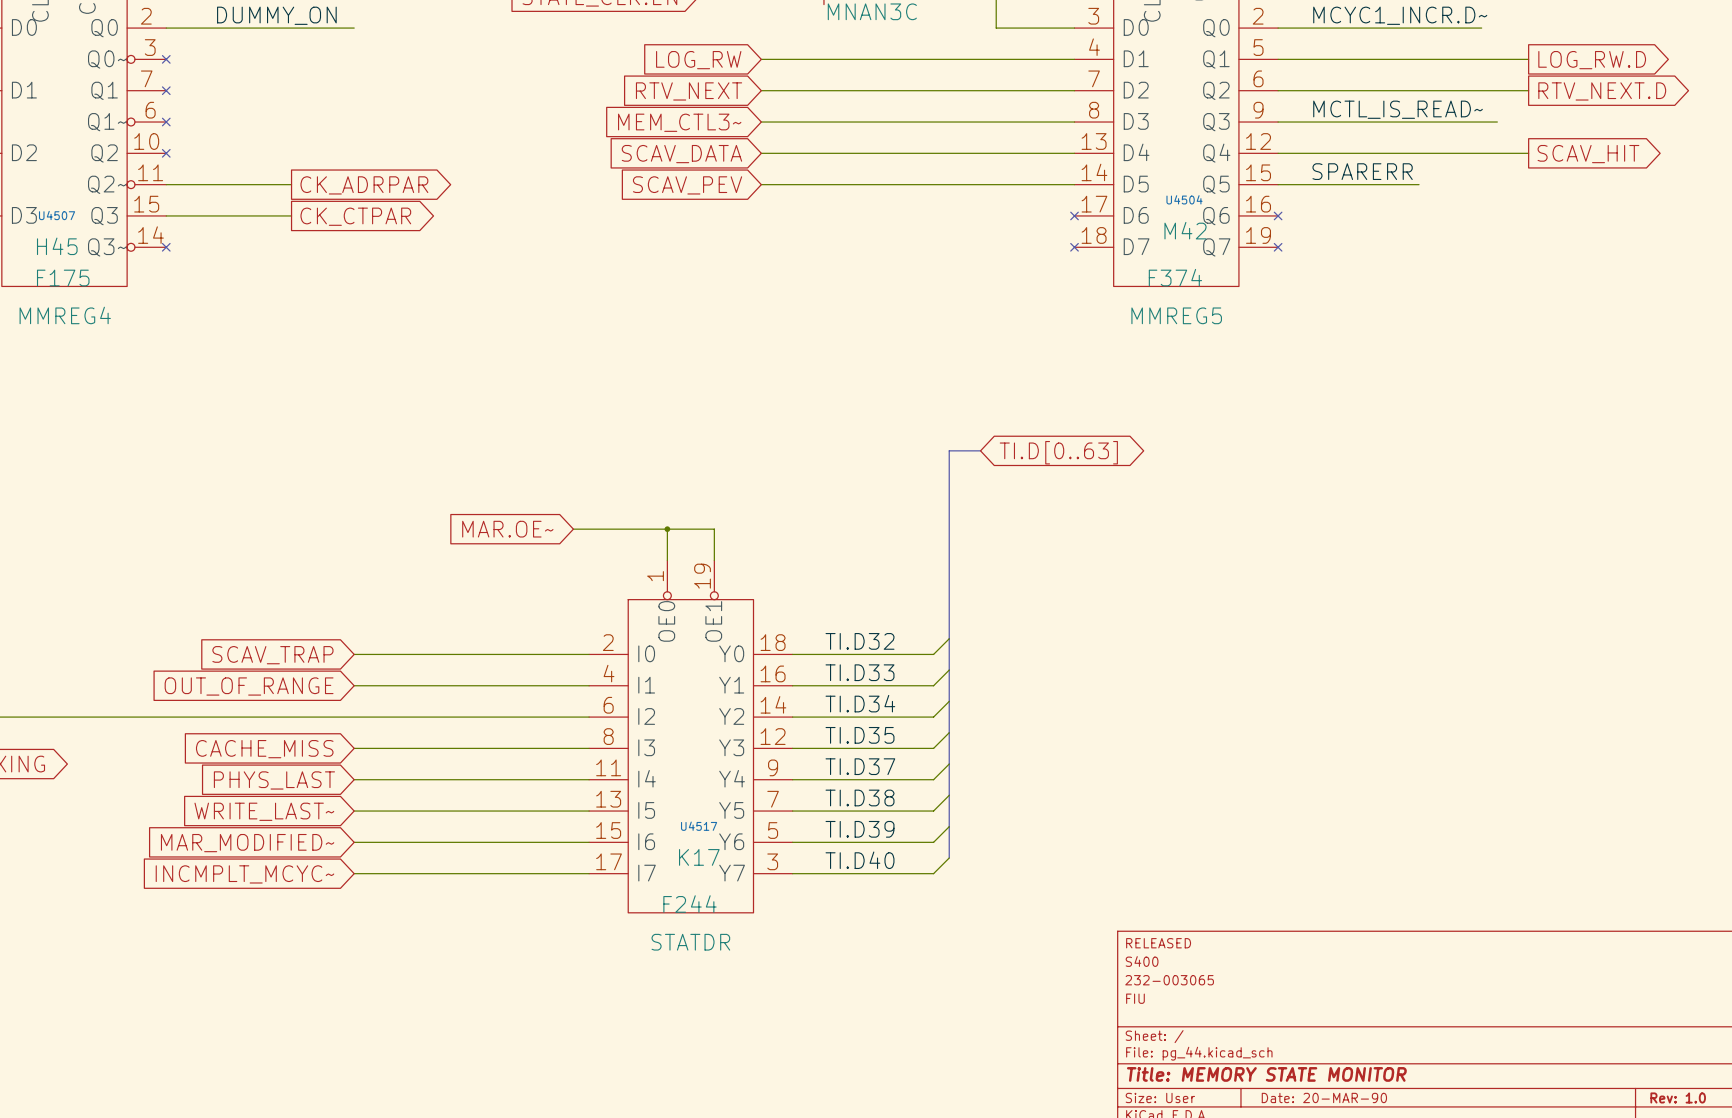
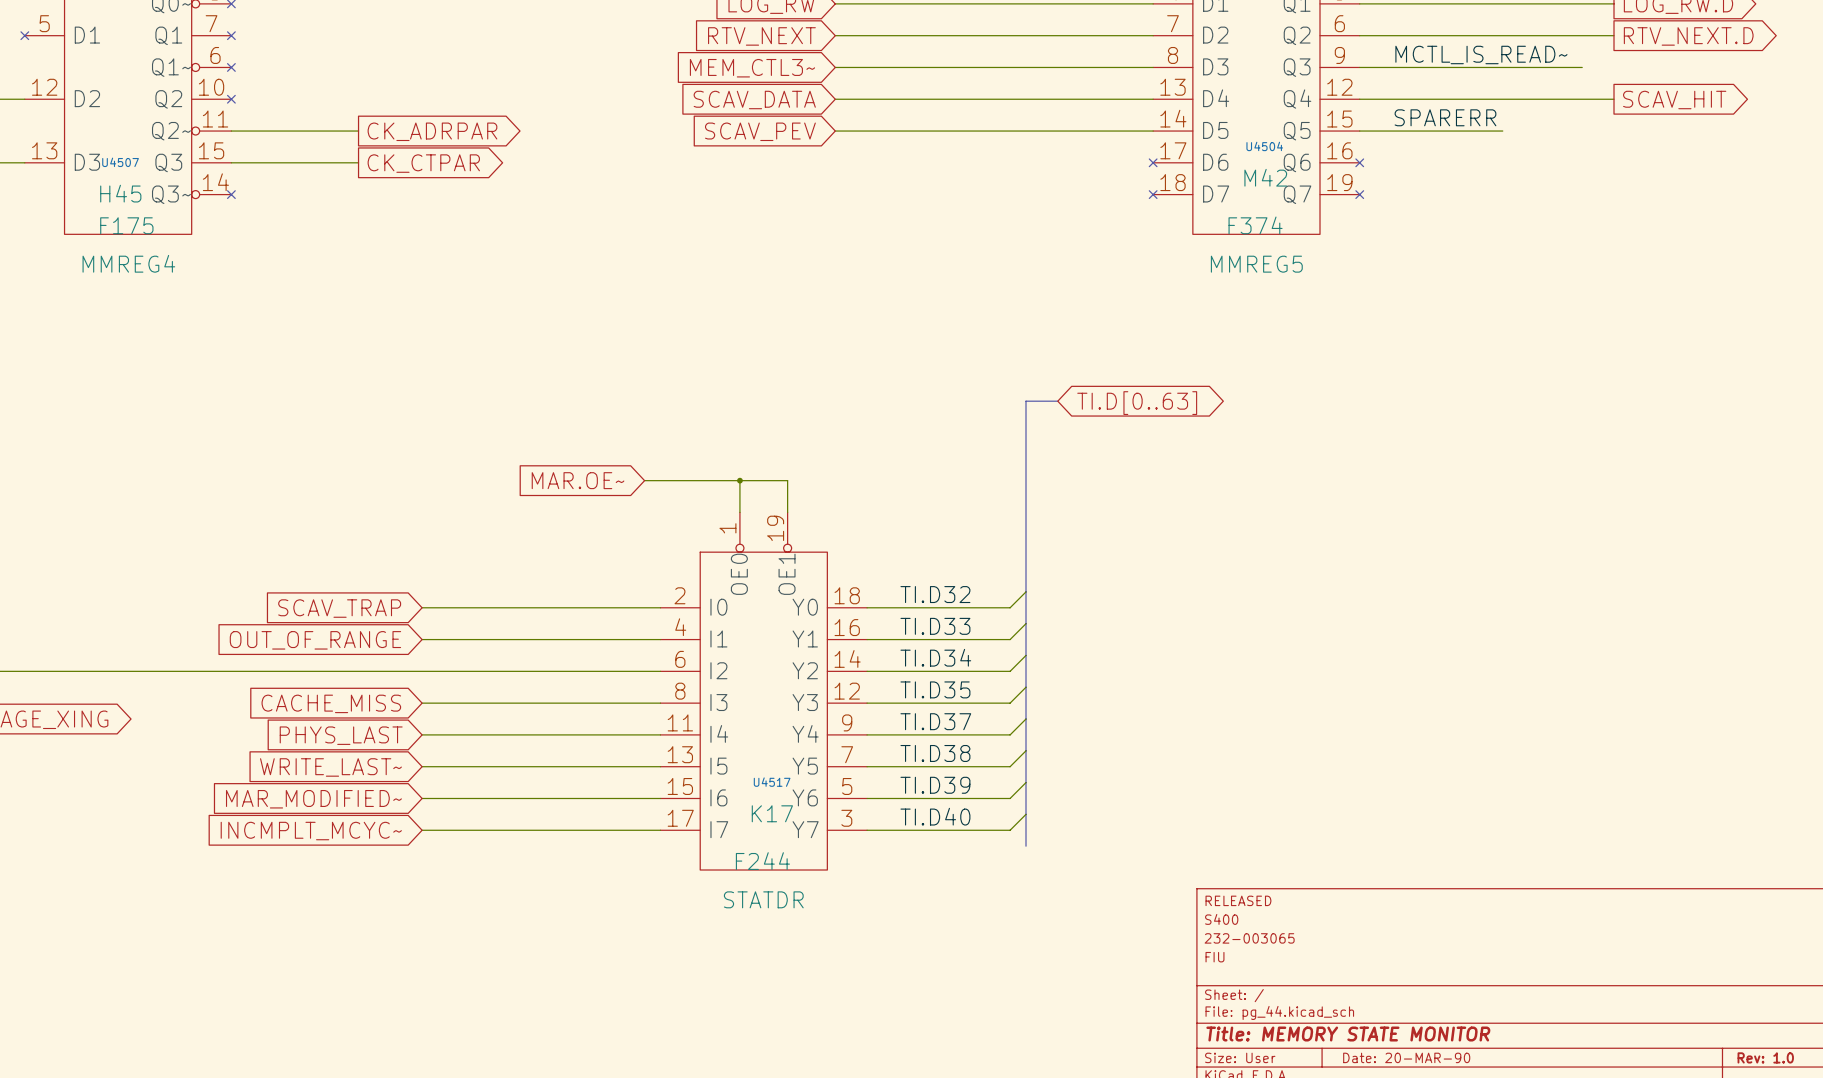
bus: none -> (1026, 814) (1026, 846)

